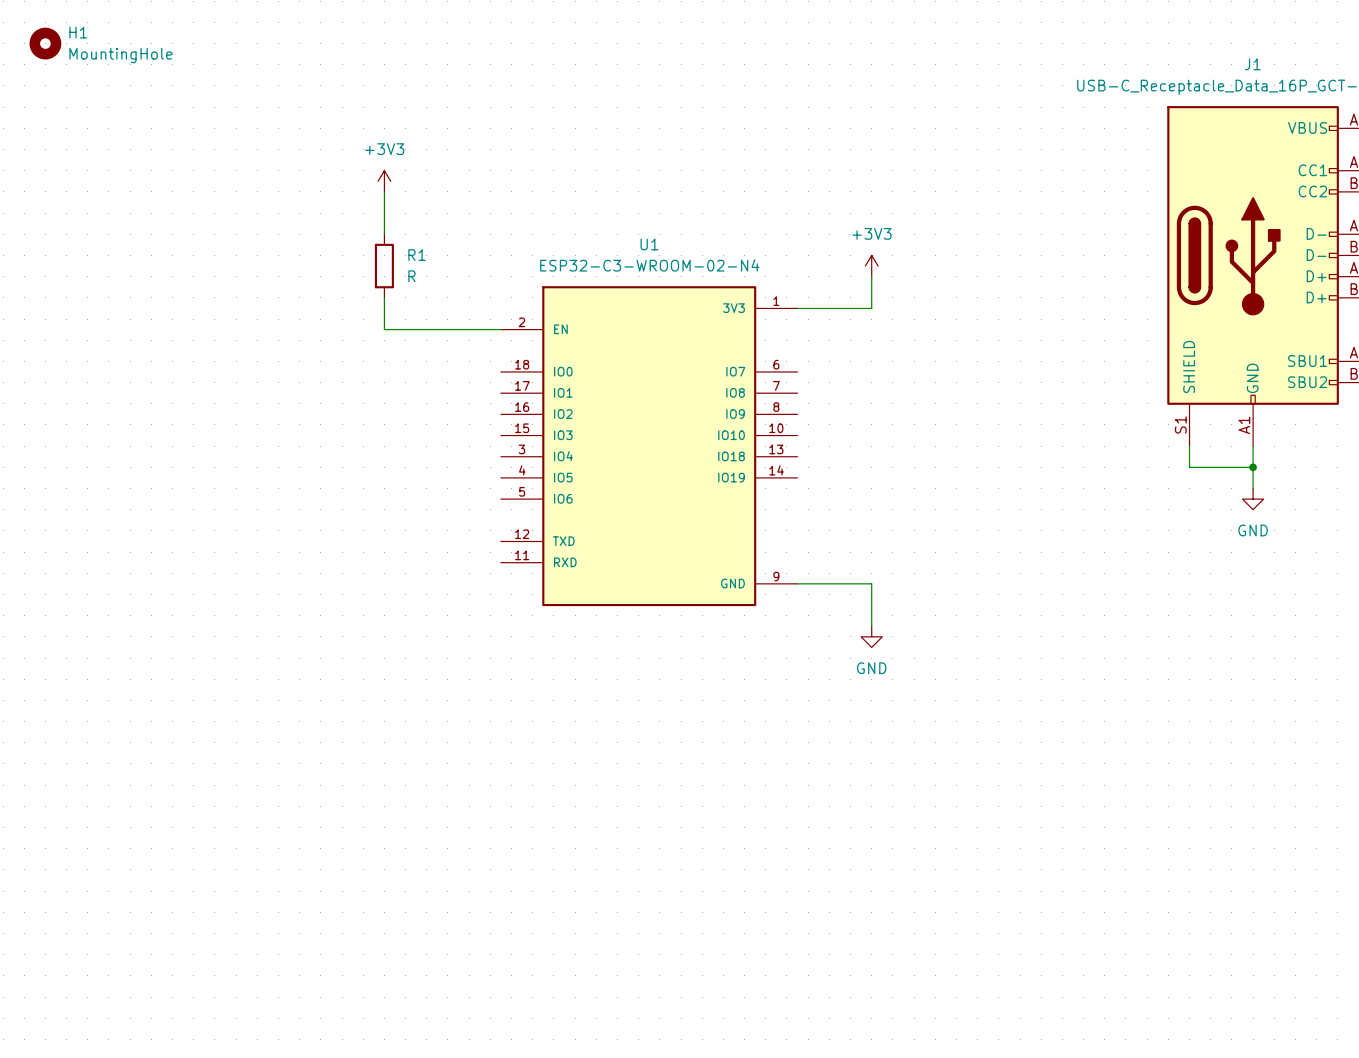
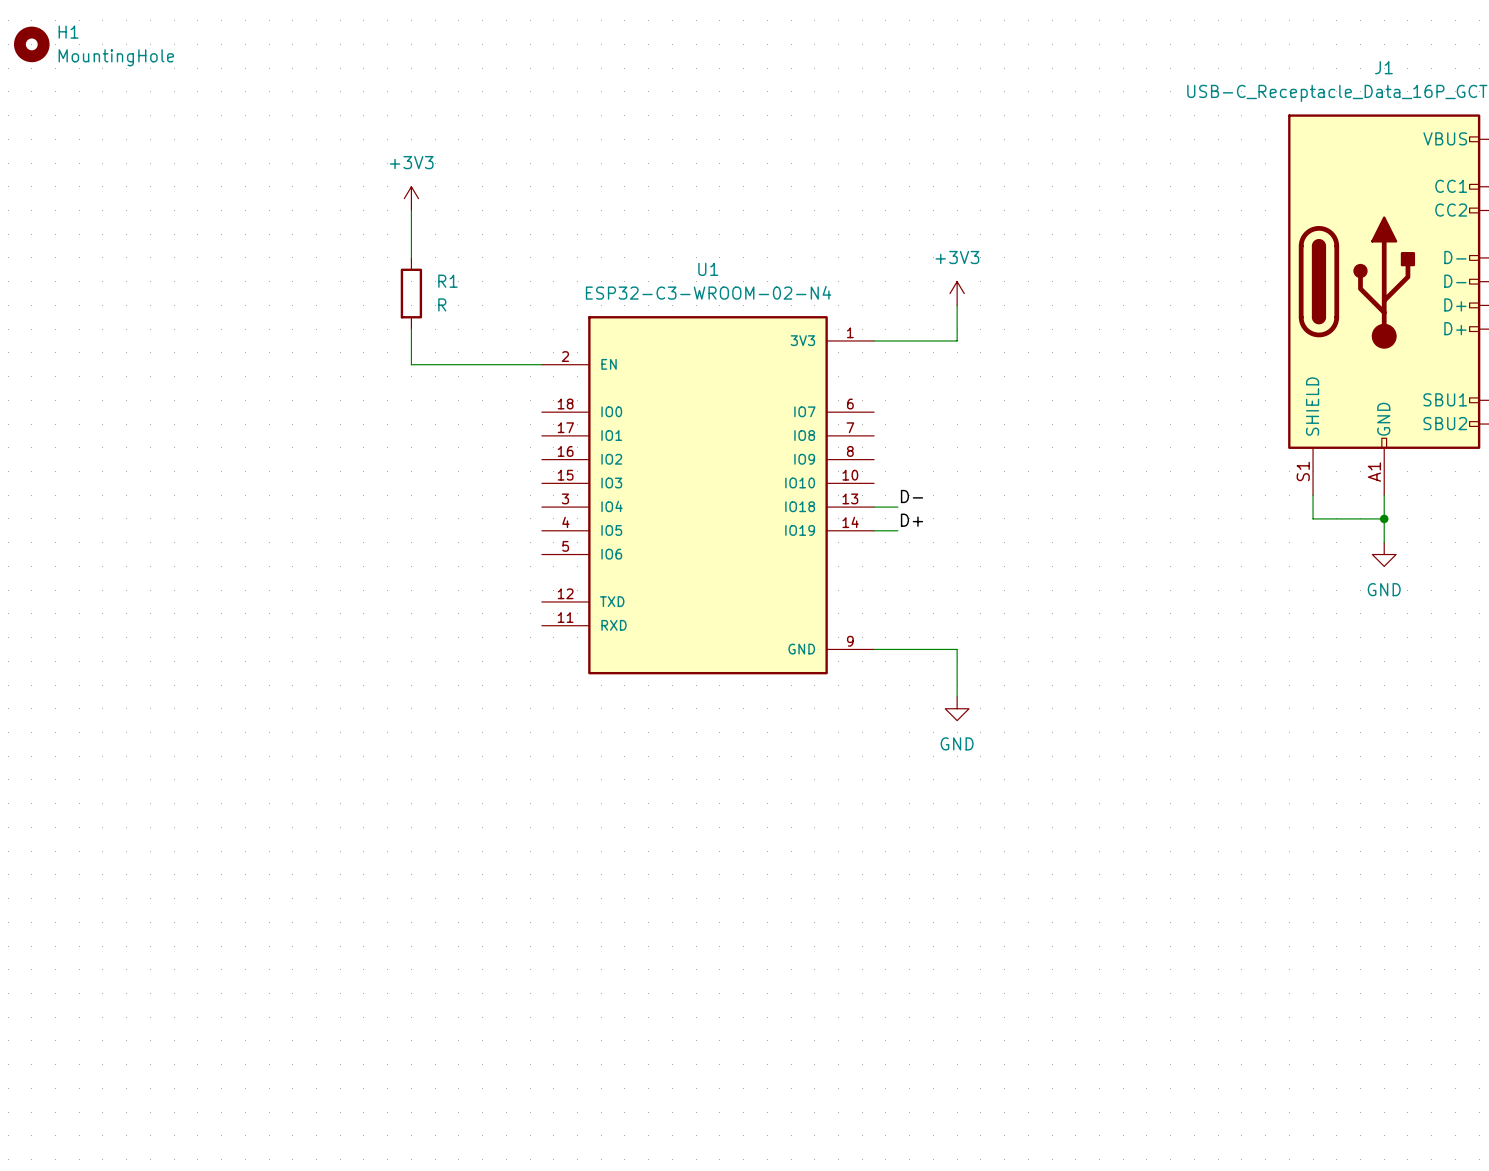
label: none -> D- (912, 496)
wire: none -> (874, 507) (897, 507)
label: none -> D+ (912, 520)
wire: none -> (874, 530) (897, 530)

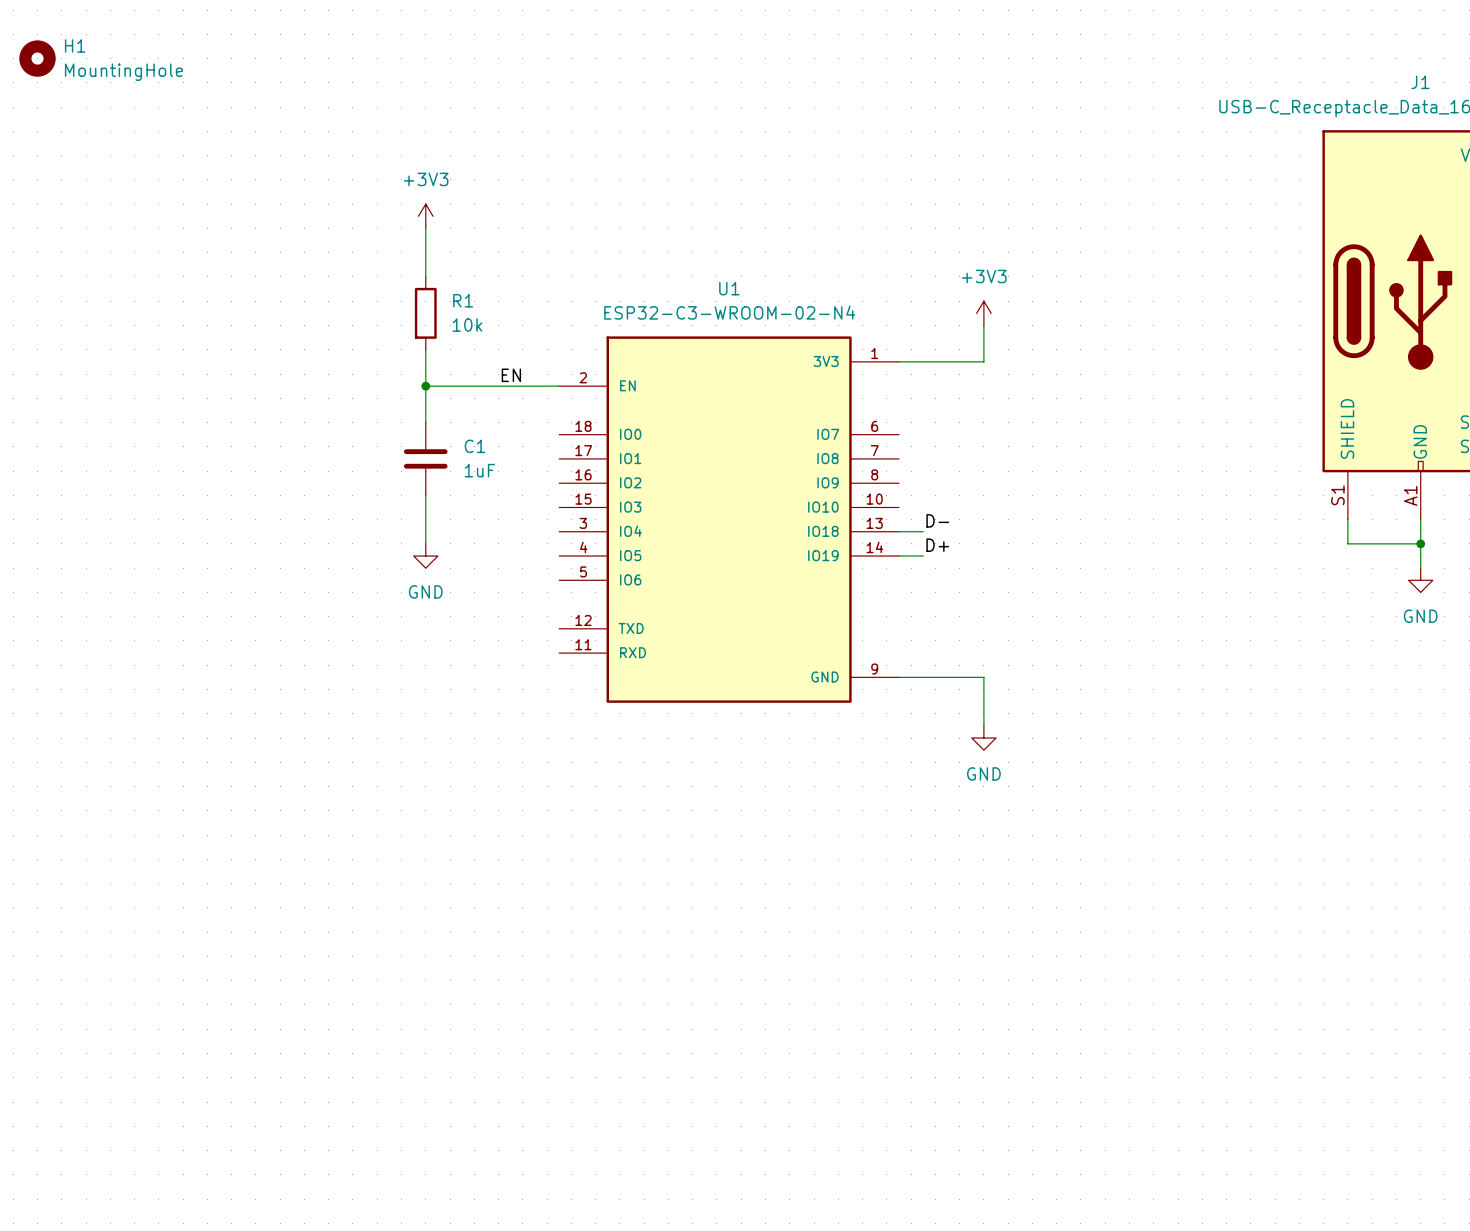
R1 value: R (442, 304) -> 10k (467, 325)
label: none -> EN (511, 375)
wire: none -> (425, 386) (425, 422)
junction: none -> (425, 386)
C1: none -> 1uF (425, 458)
wire: none -> (425, 495) (425, 543)
power symbol: none -> GND (425, 556)

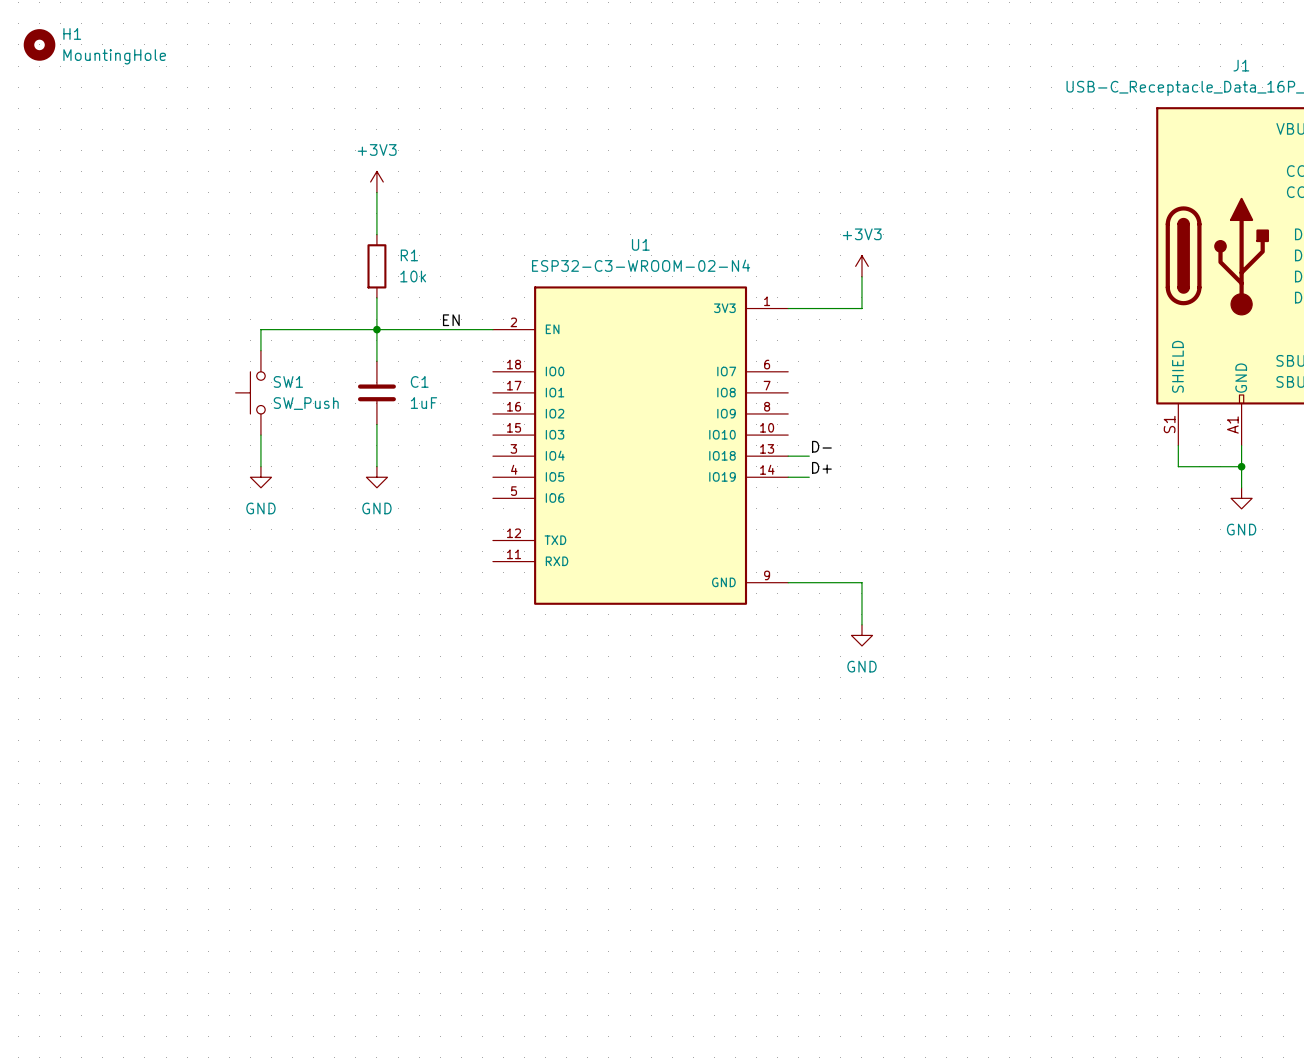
wire: none -> (376, 329) (260, 329) (260, 350)
SW1: none -> SW_Push (250, 392)
wire: none -> (260, 435) (260, 466)
power symbol: none -> GND (260, 477)

